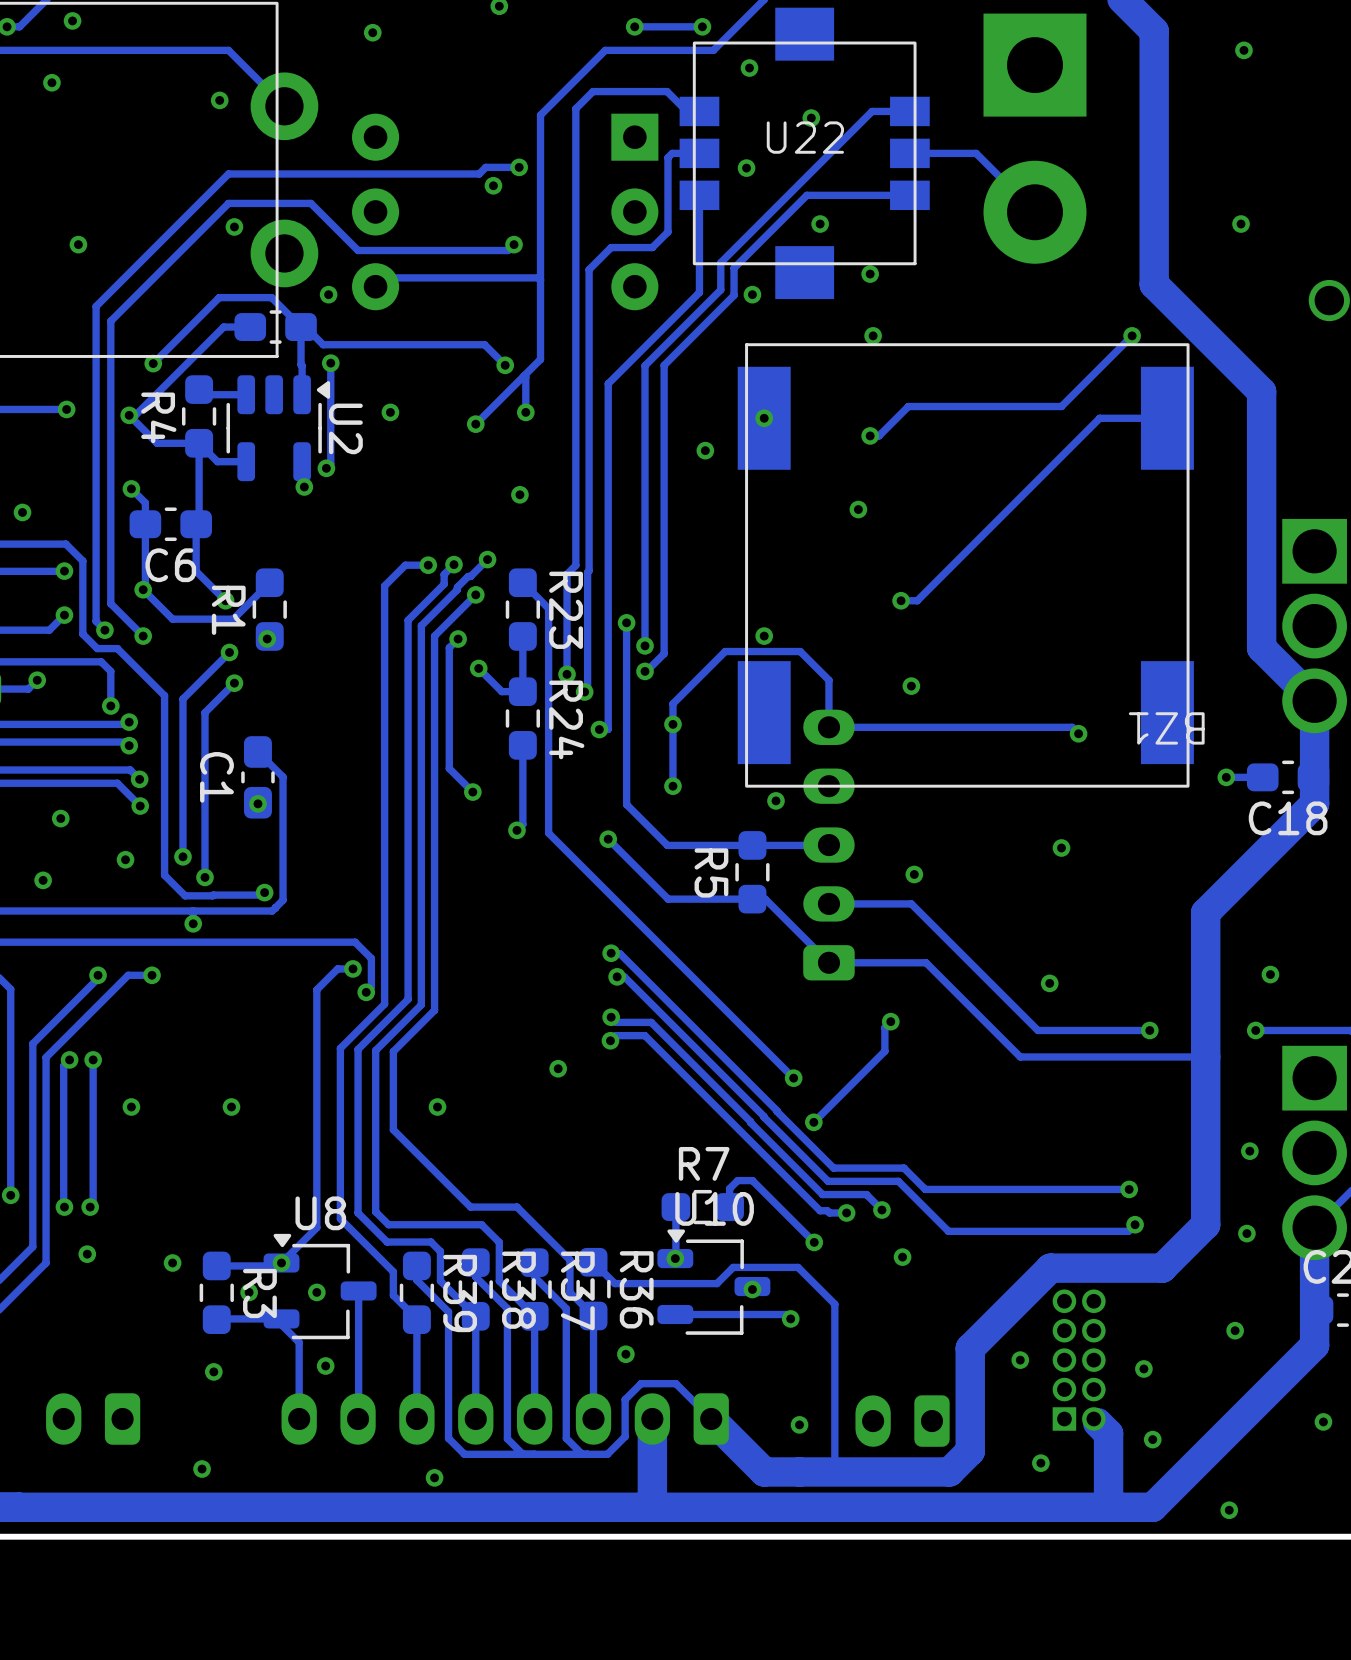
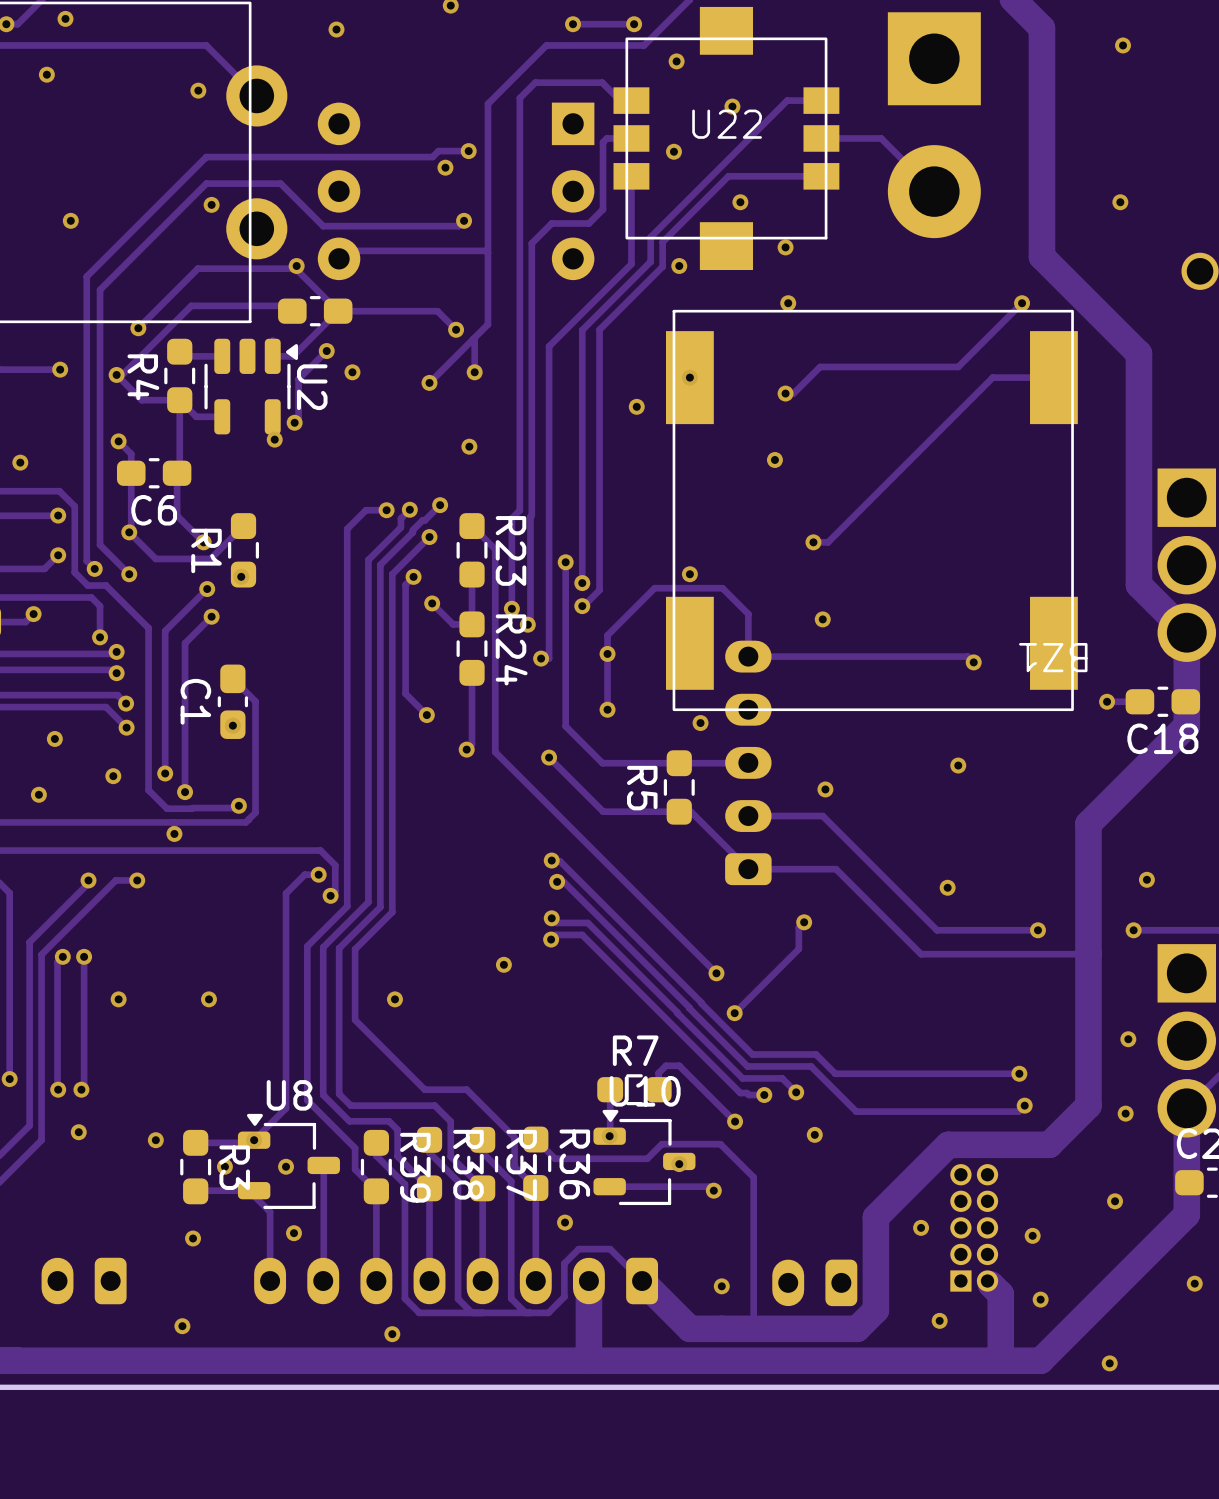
track: (271, 297) (301, 327) -> (245, 268) (295, 268) (338, 311) (293, 356) (272, 356)
track: (250, 327) (223, 327) (211, 338) -> (292, 311) (287, 305) (191, 305)
part position: (275, 327) -> (315, 311)
track: (301, 327) (302, 377) -> none
track: (301, 327) (305, 327) (323, 344) (374, 344) -> none
track: (330, 363) (330, 420) -> (326, 351) (298, 379)
via position: (330, 363) -> (326, 351)

